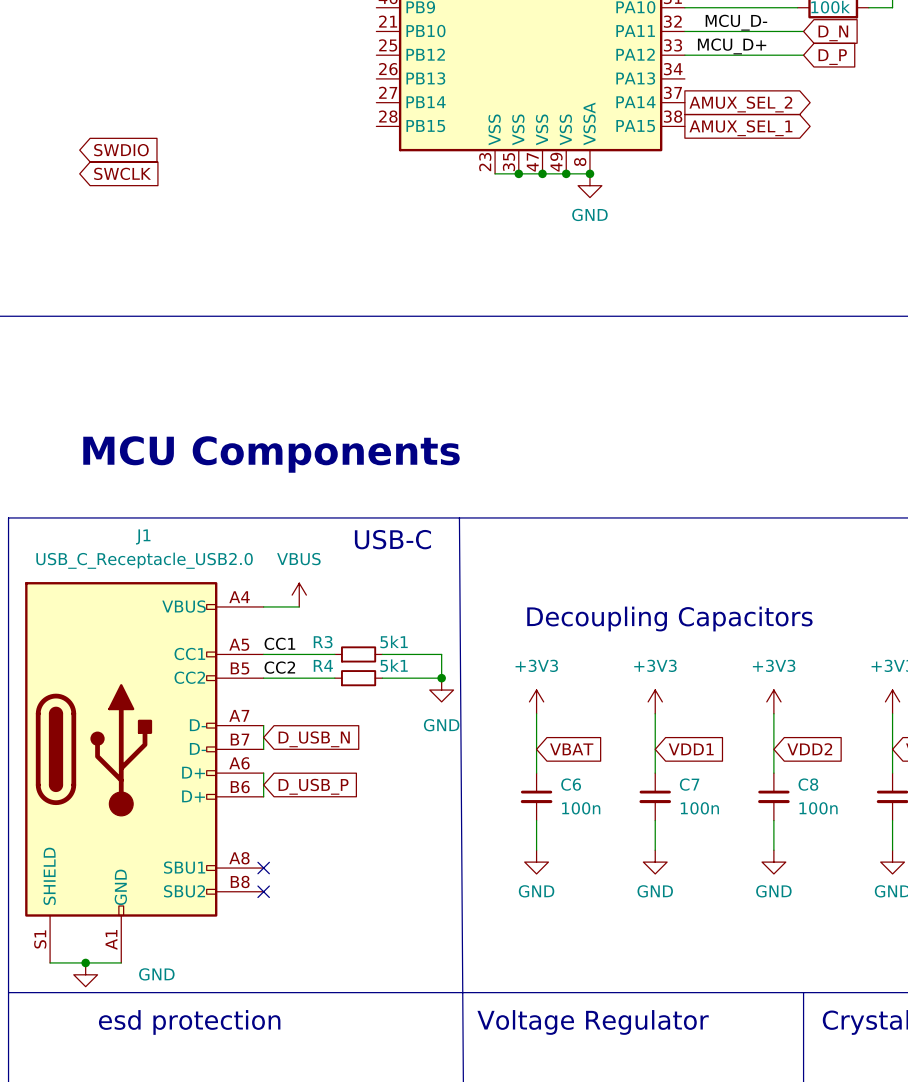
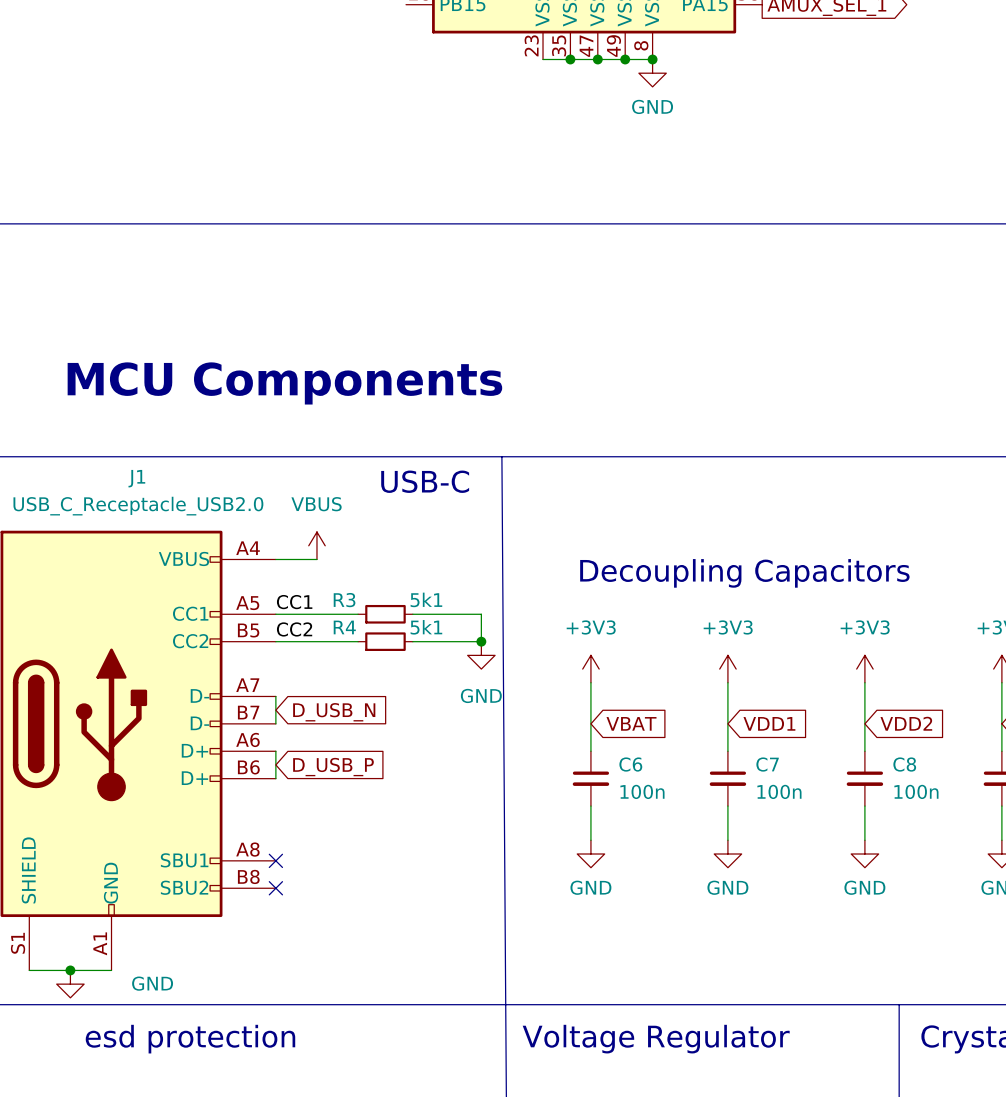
global label: SWDIO (121, 150) -> none
global label: SWCLK (122, 173) -> none

